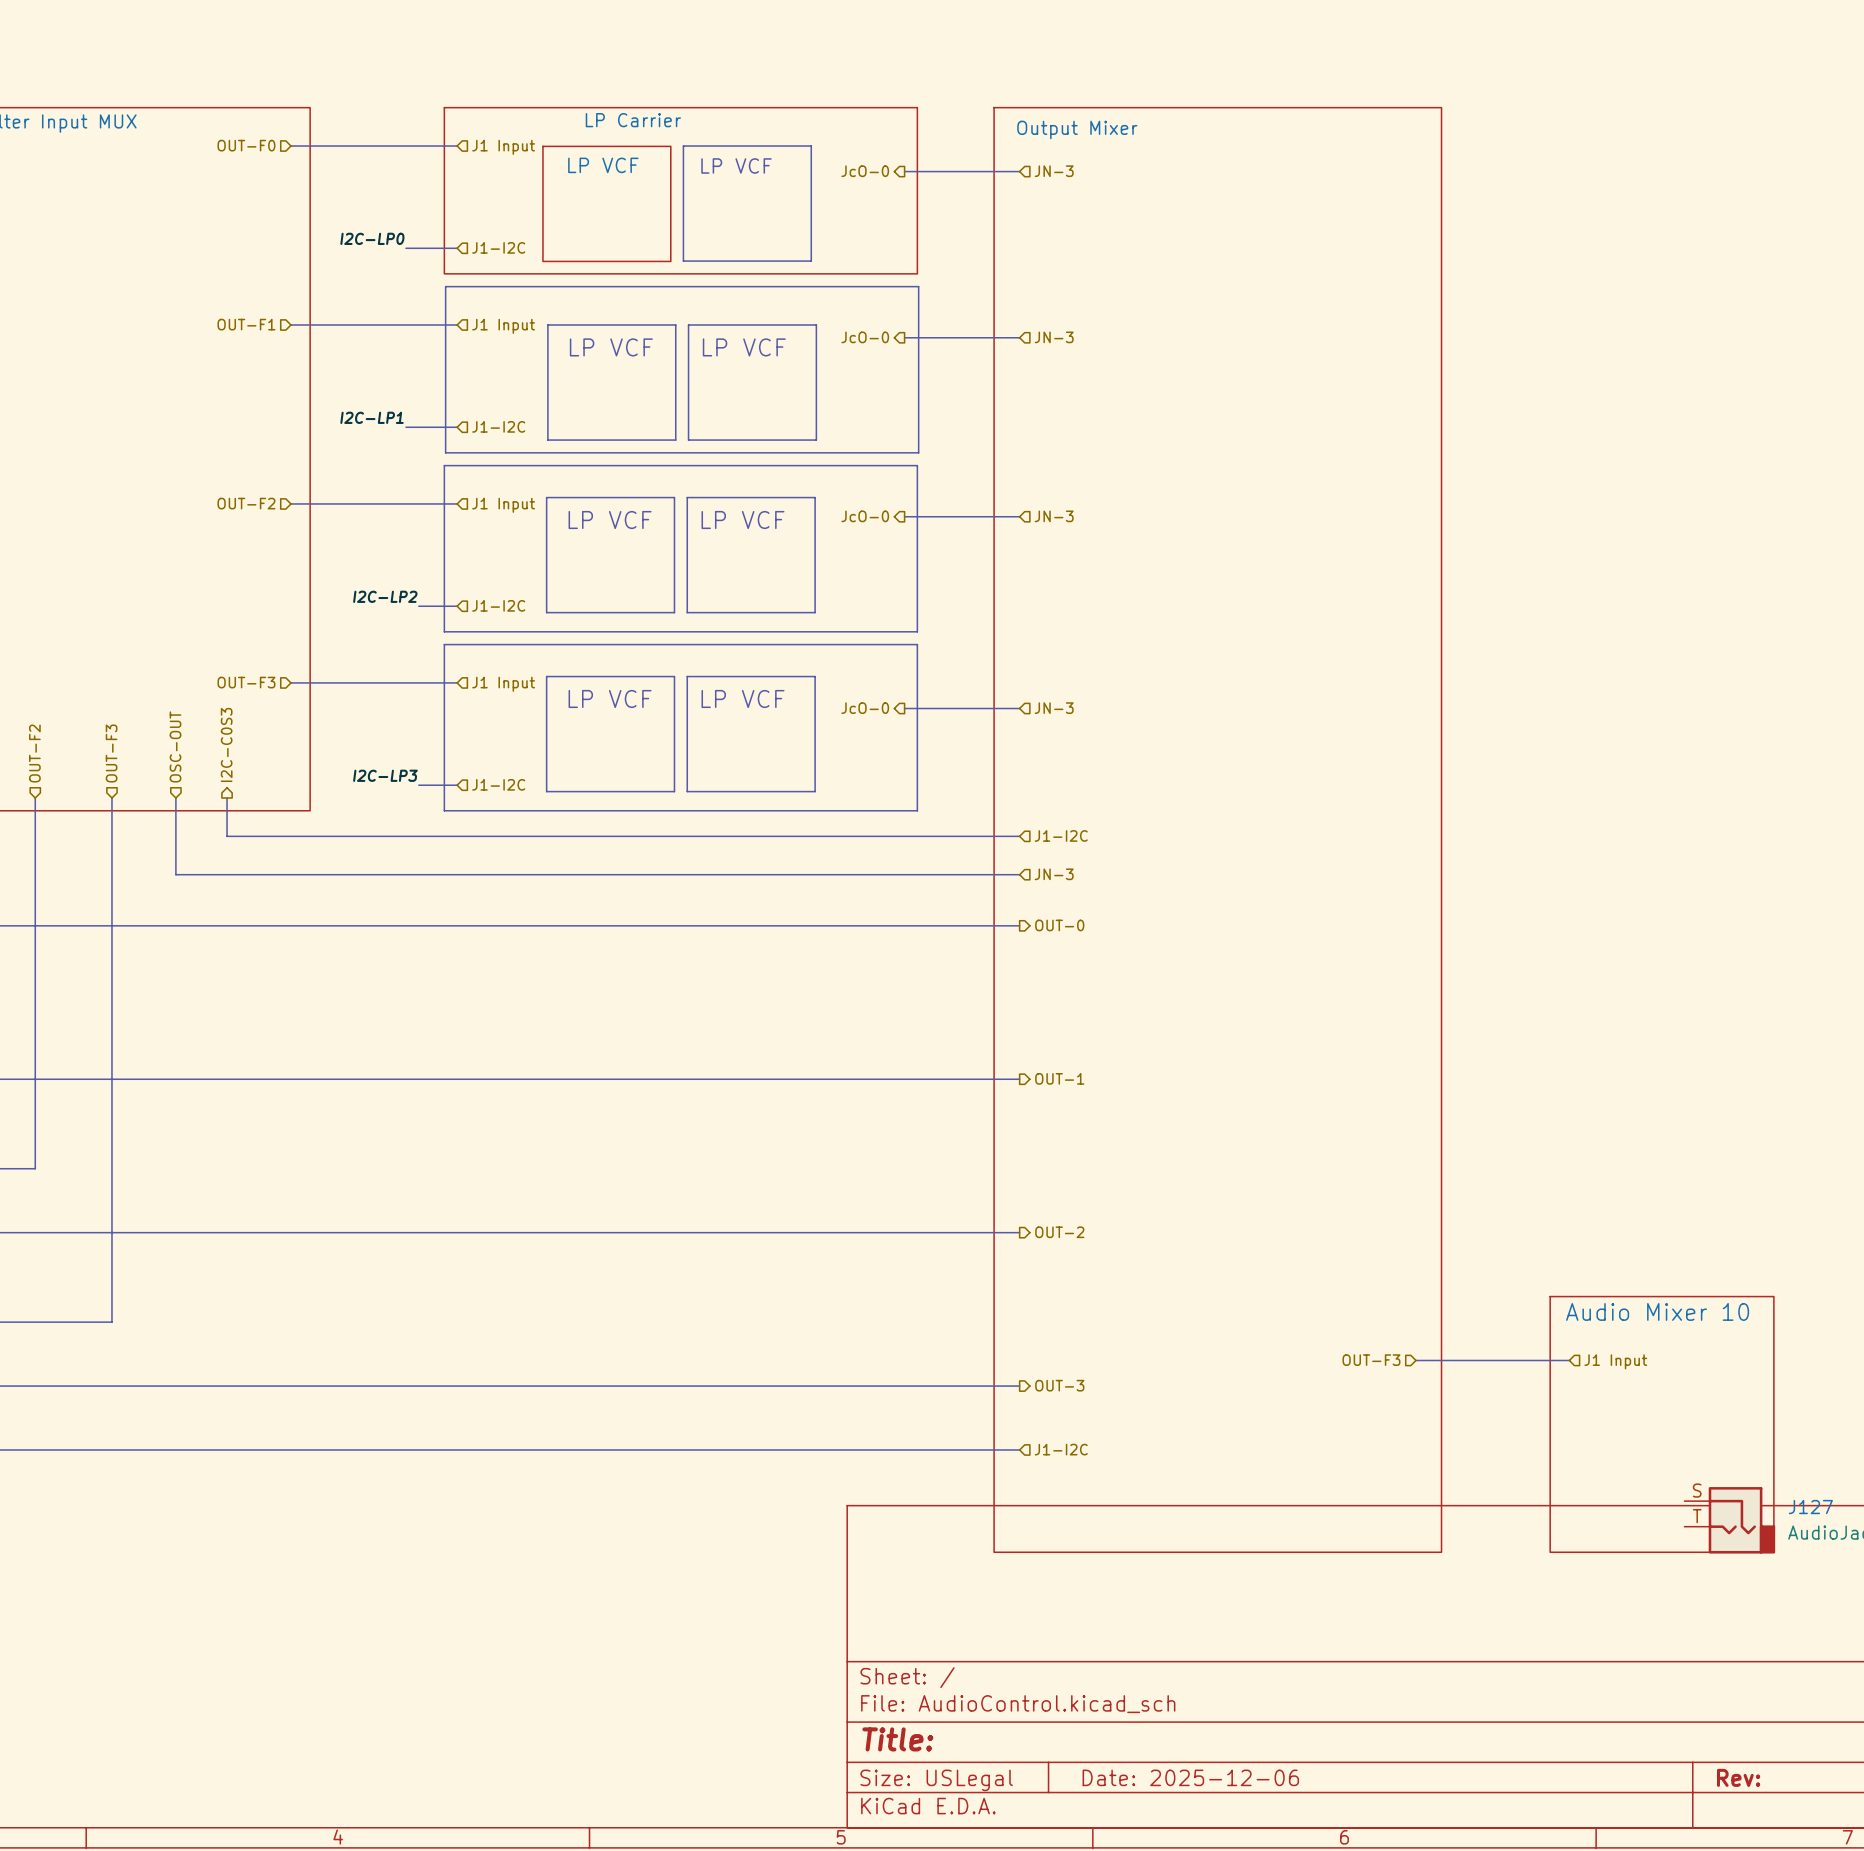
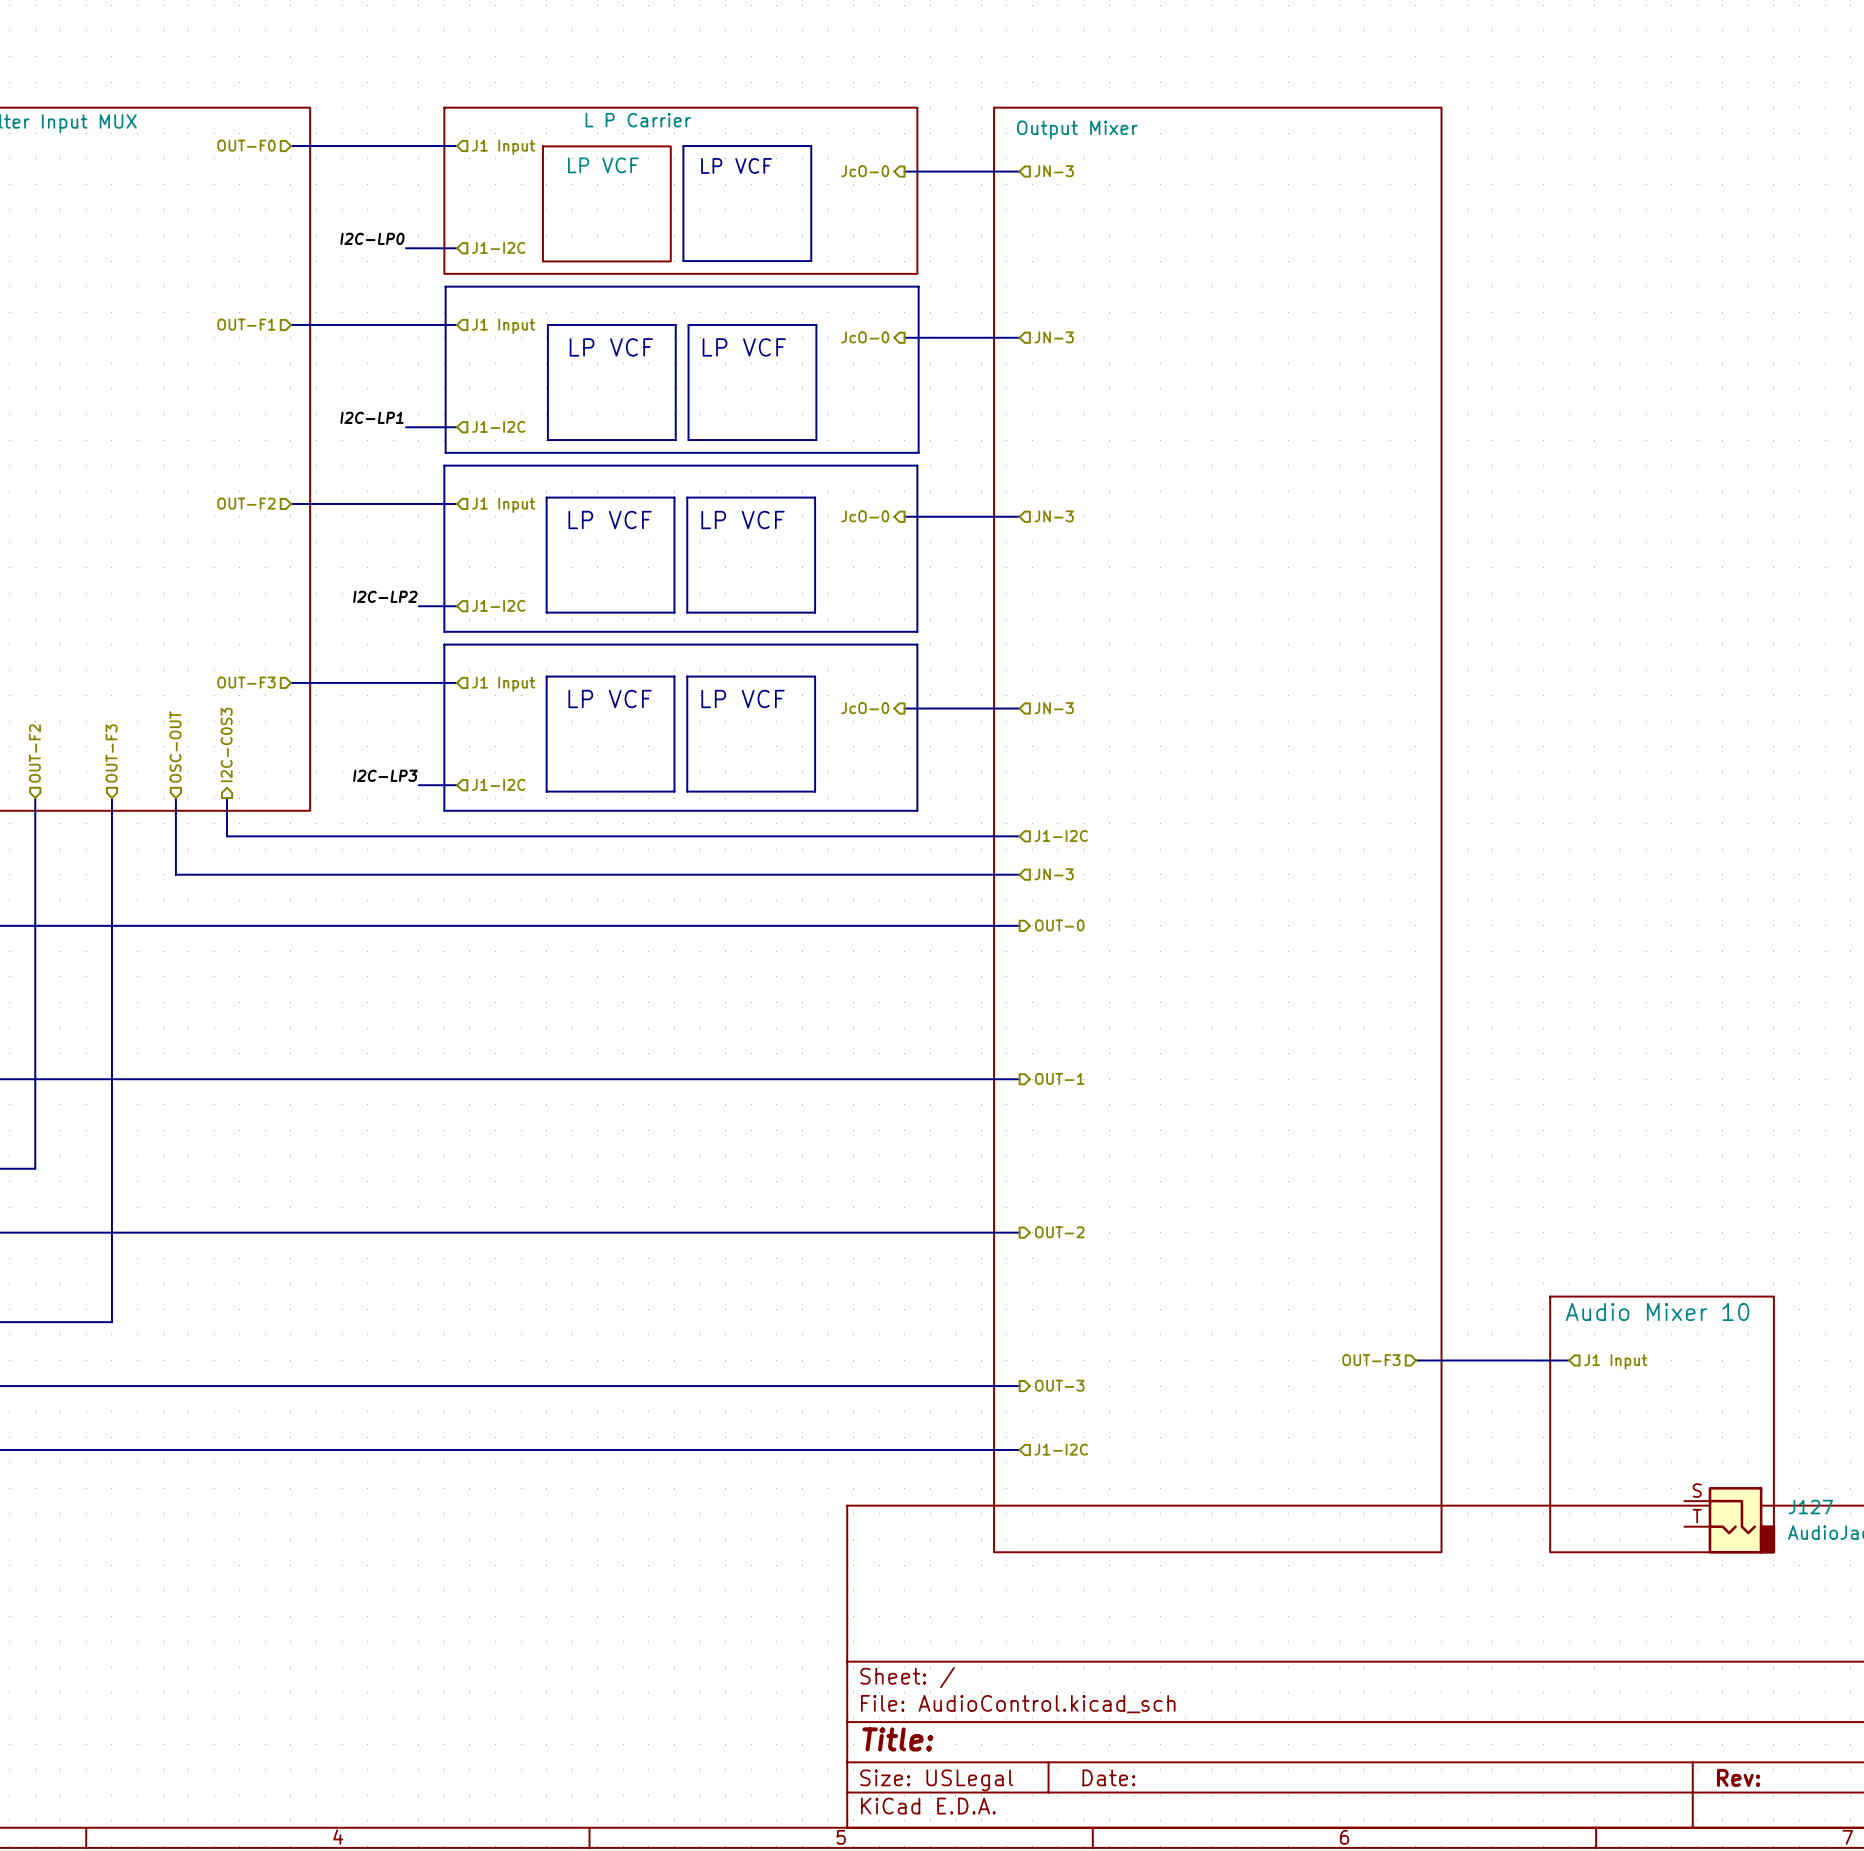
sheet LP Carrier name: LP Carrier (633, 120) -> L P Carrier (638, 120)
title block: Date: 2025-12-06 (1190, 1777) -> Date: (1108, 1777)

